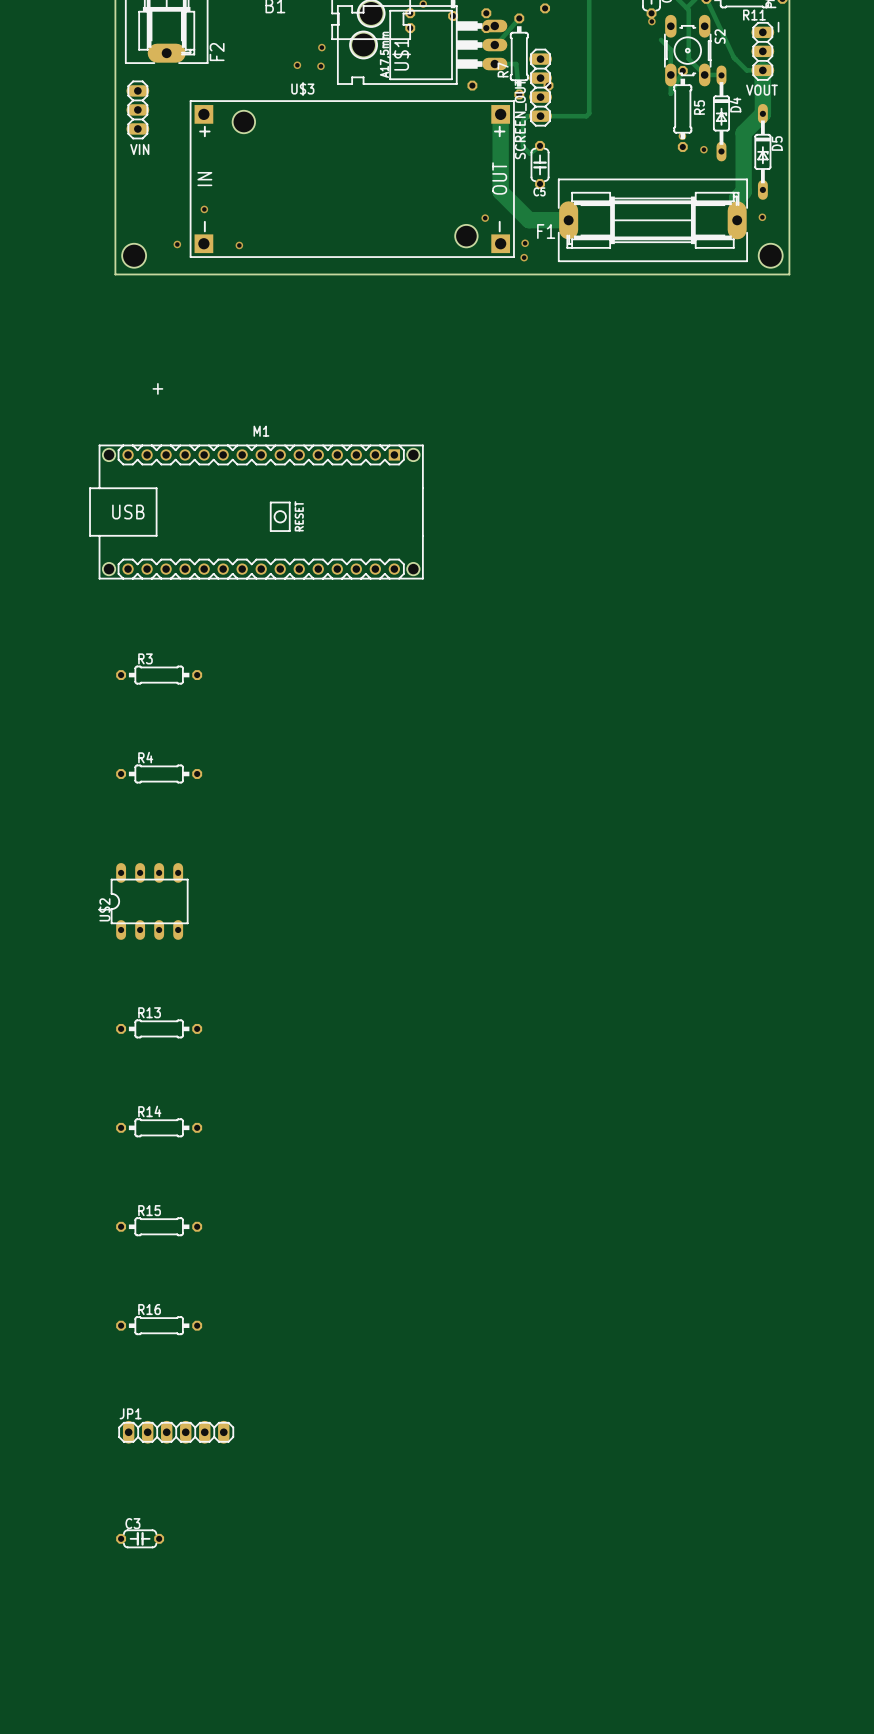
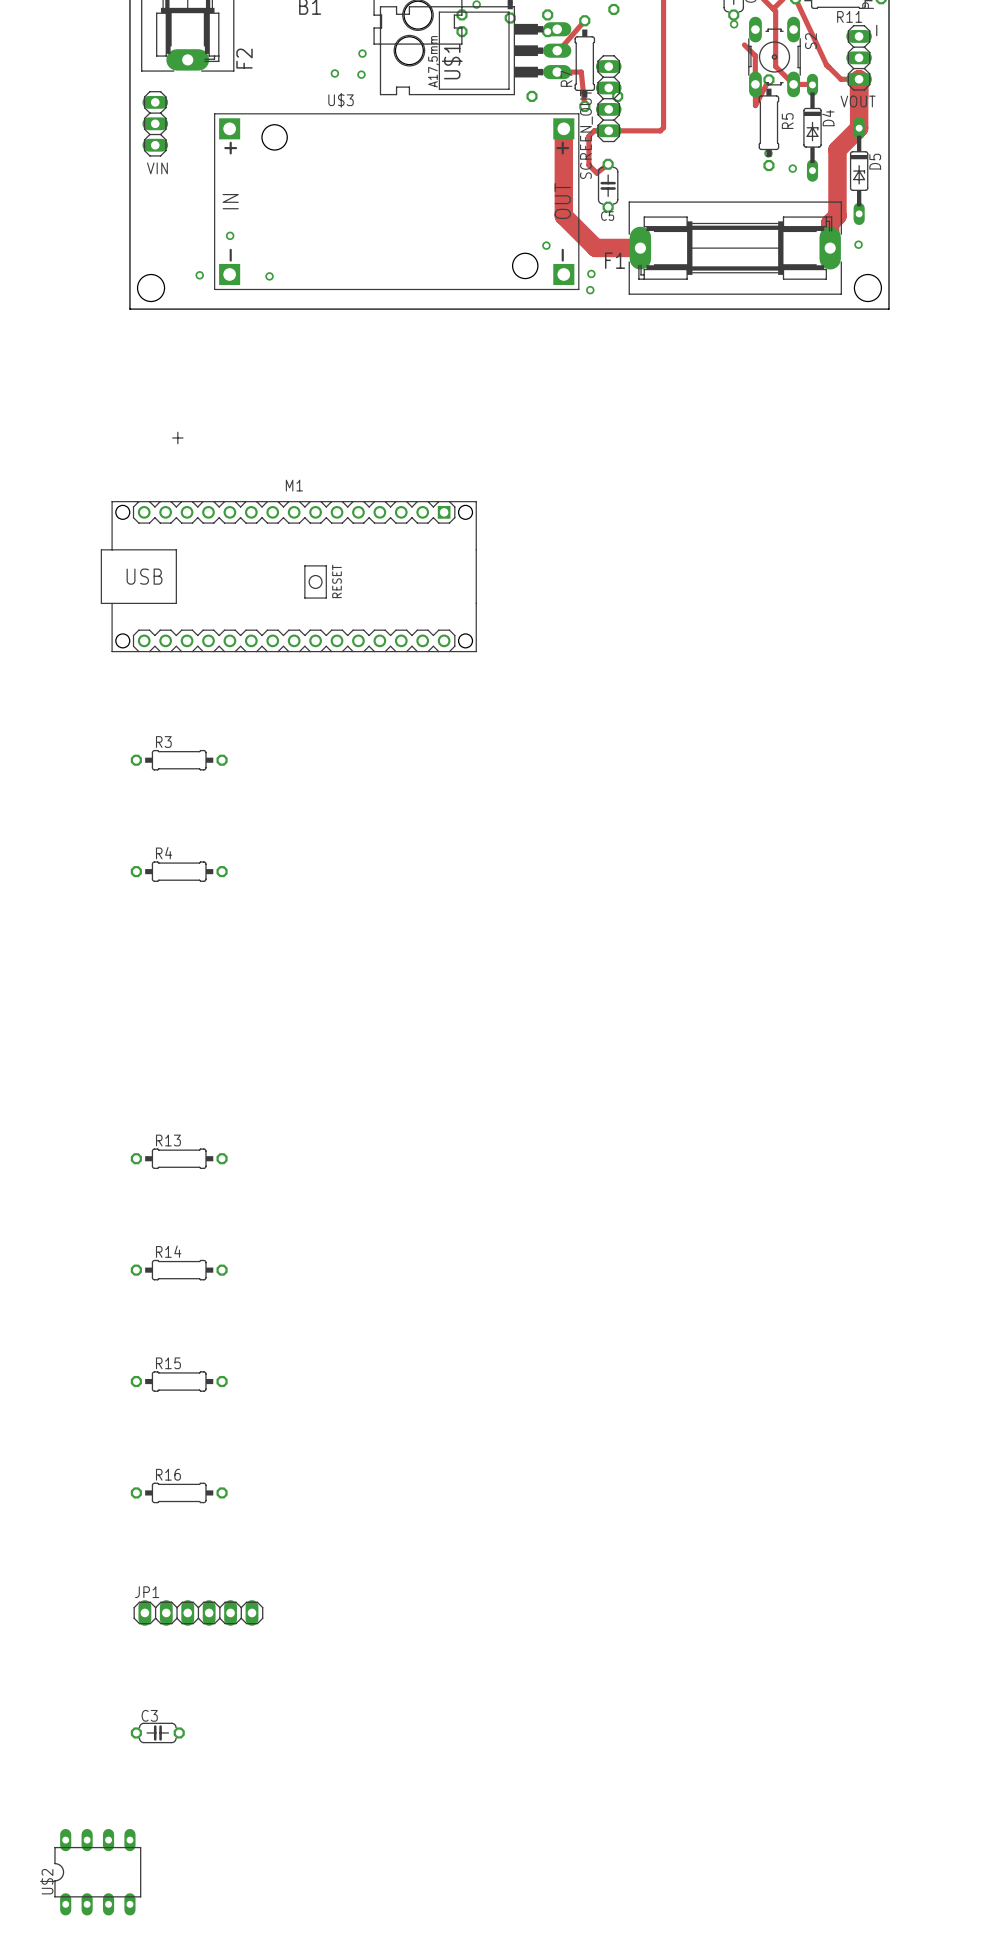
U$2 position: (149, 901) -> (97, 1872)

